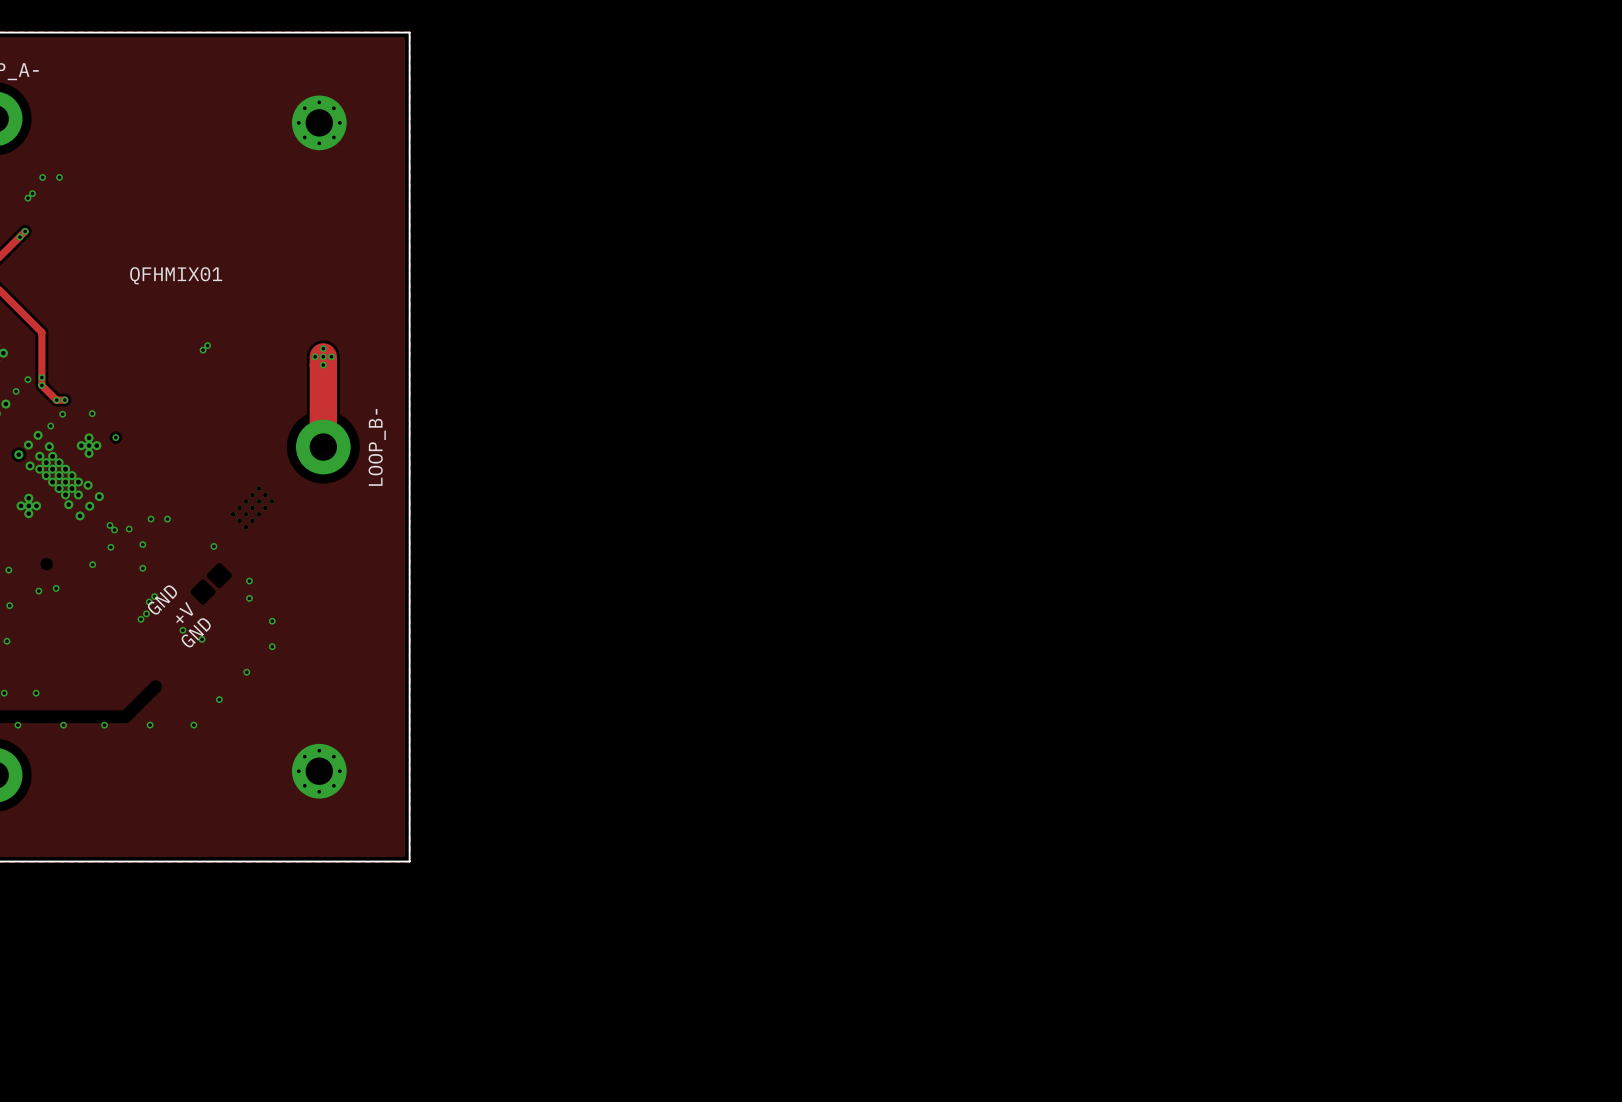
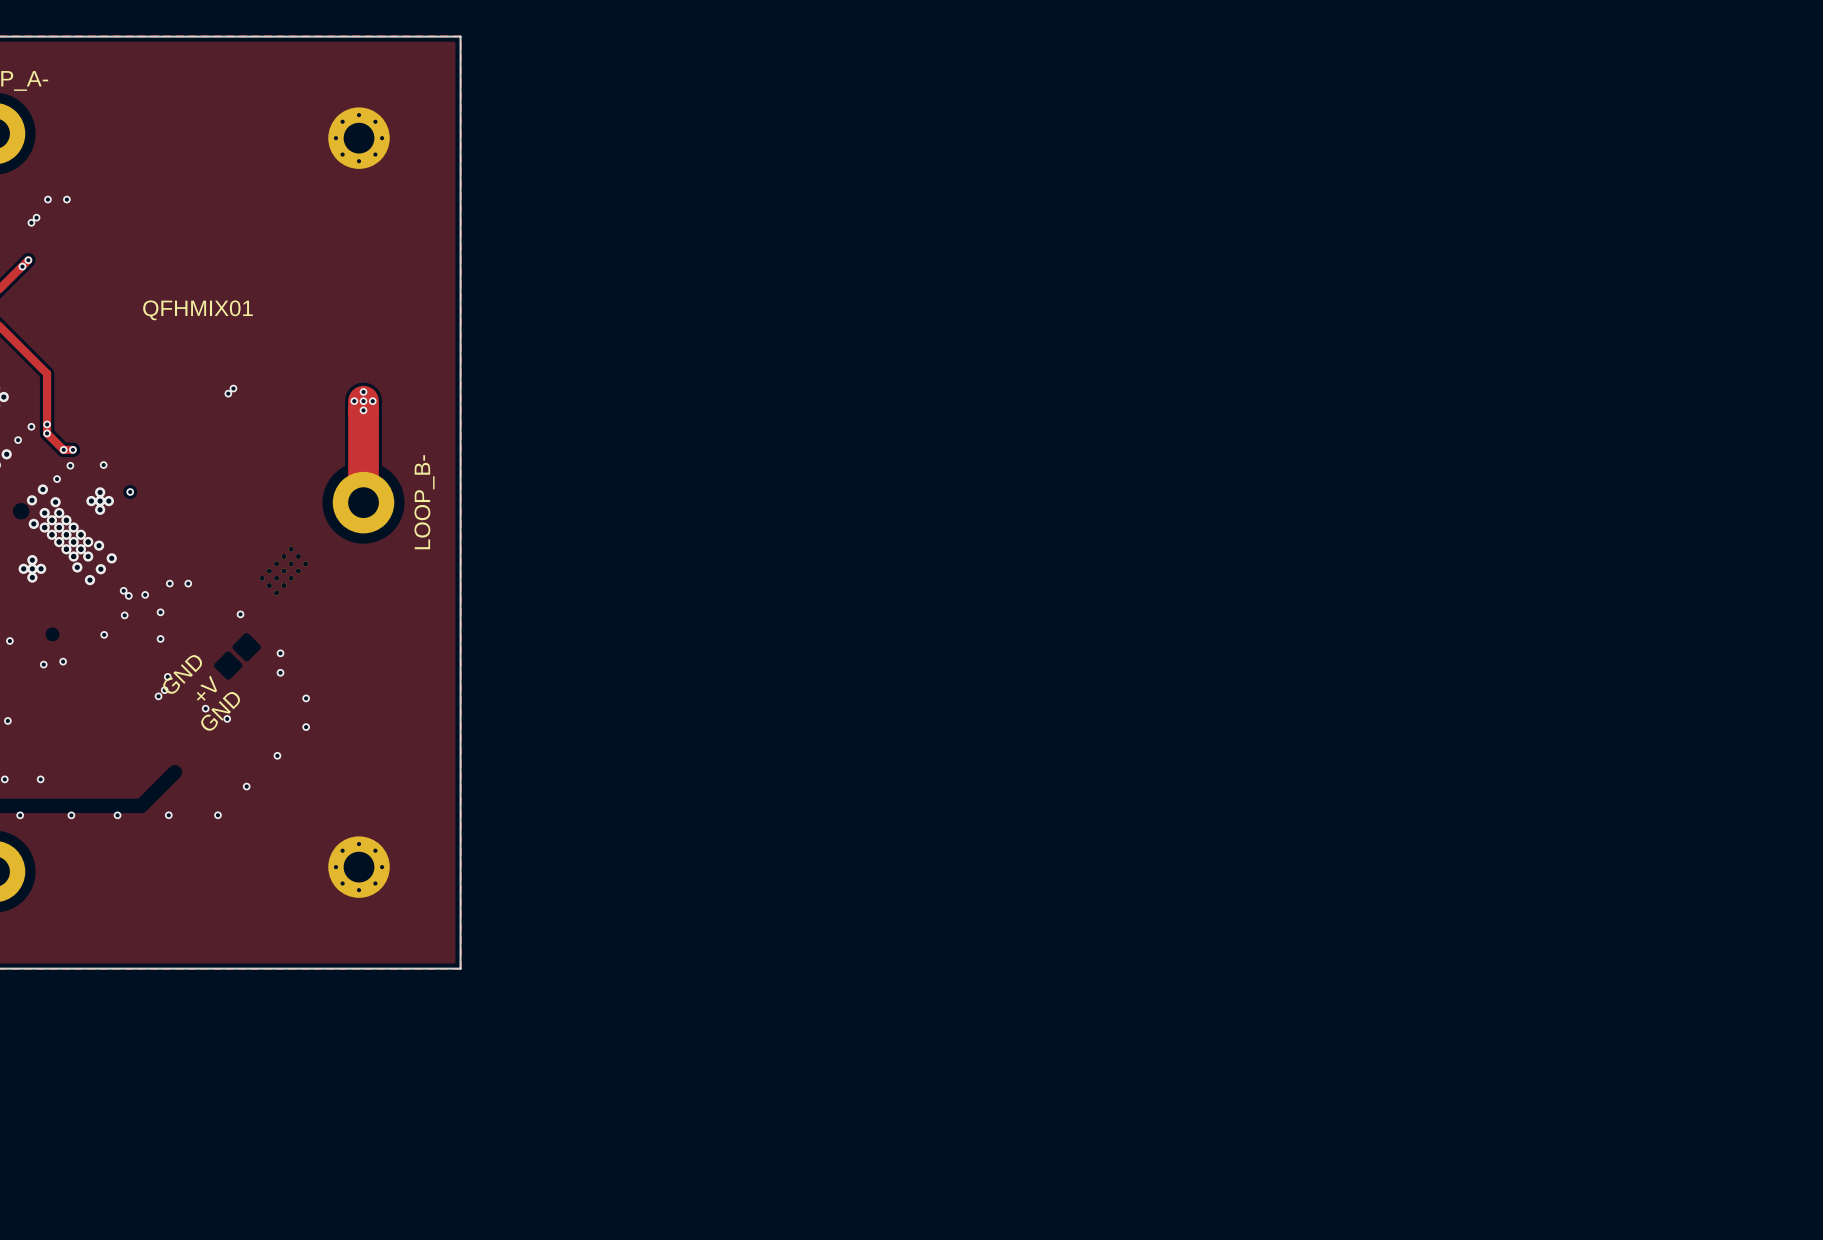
via: (18, 454) -> none
via: (154, 596) -> none
via: (9, 605) -> none

